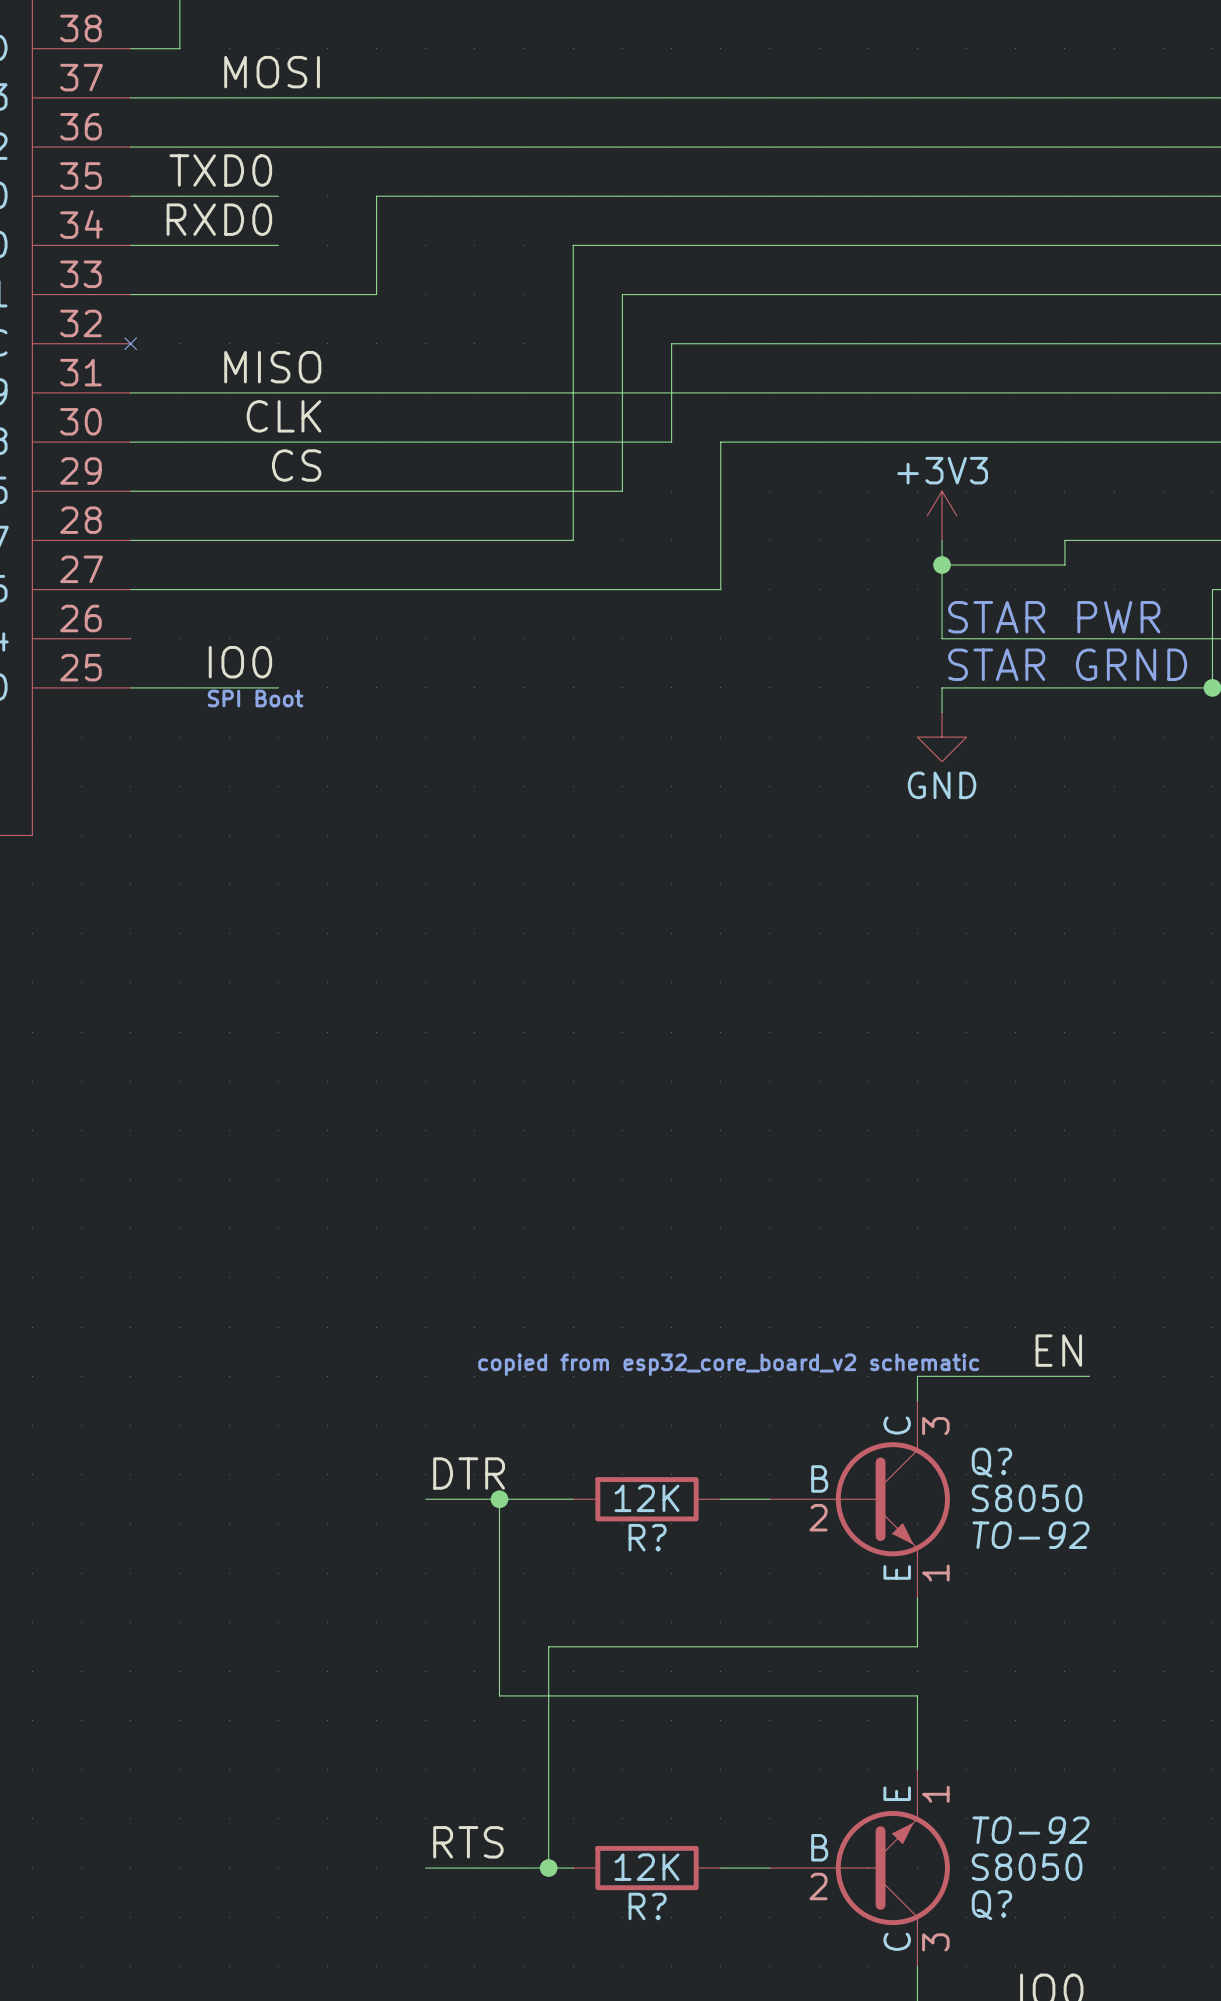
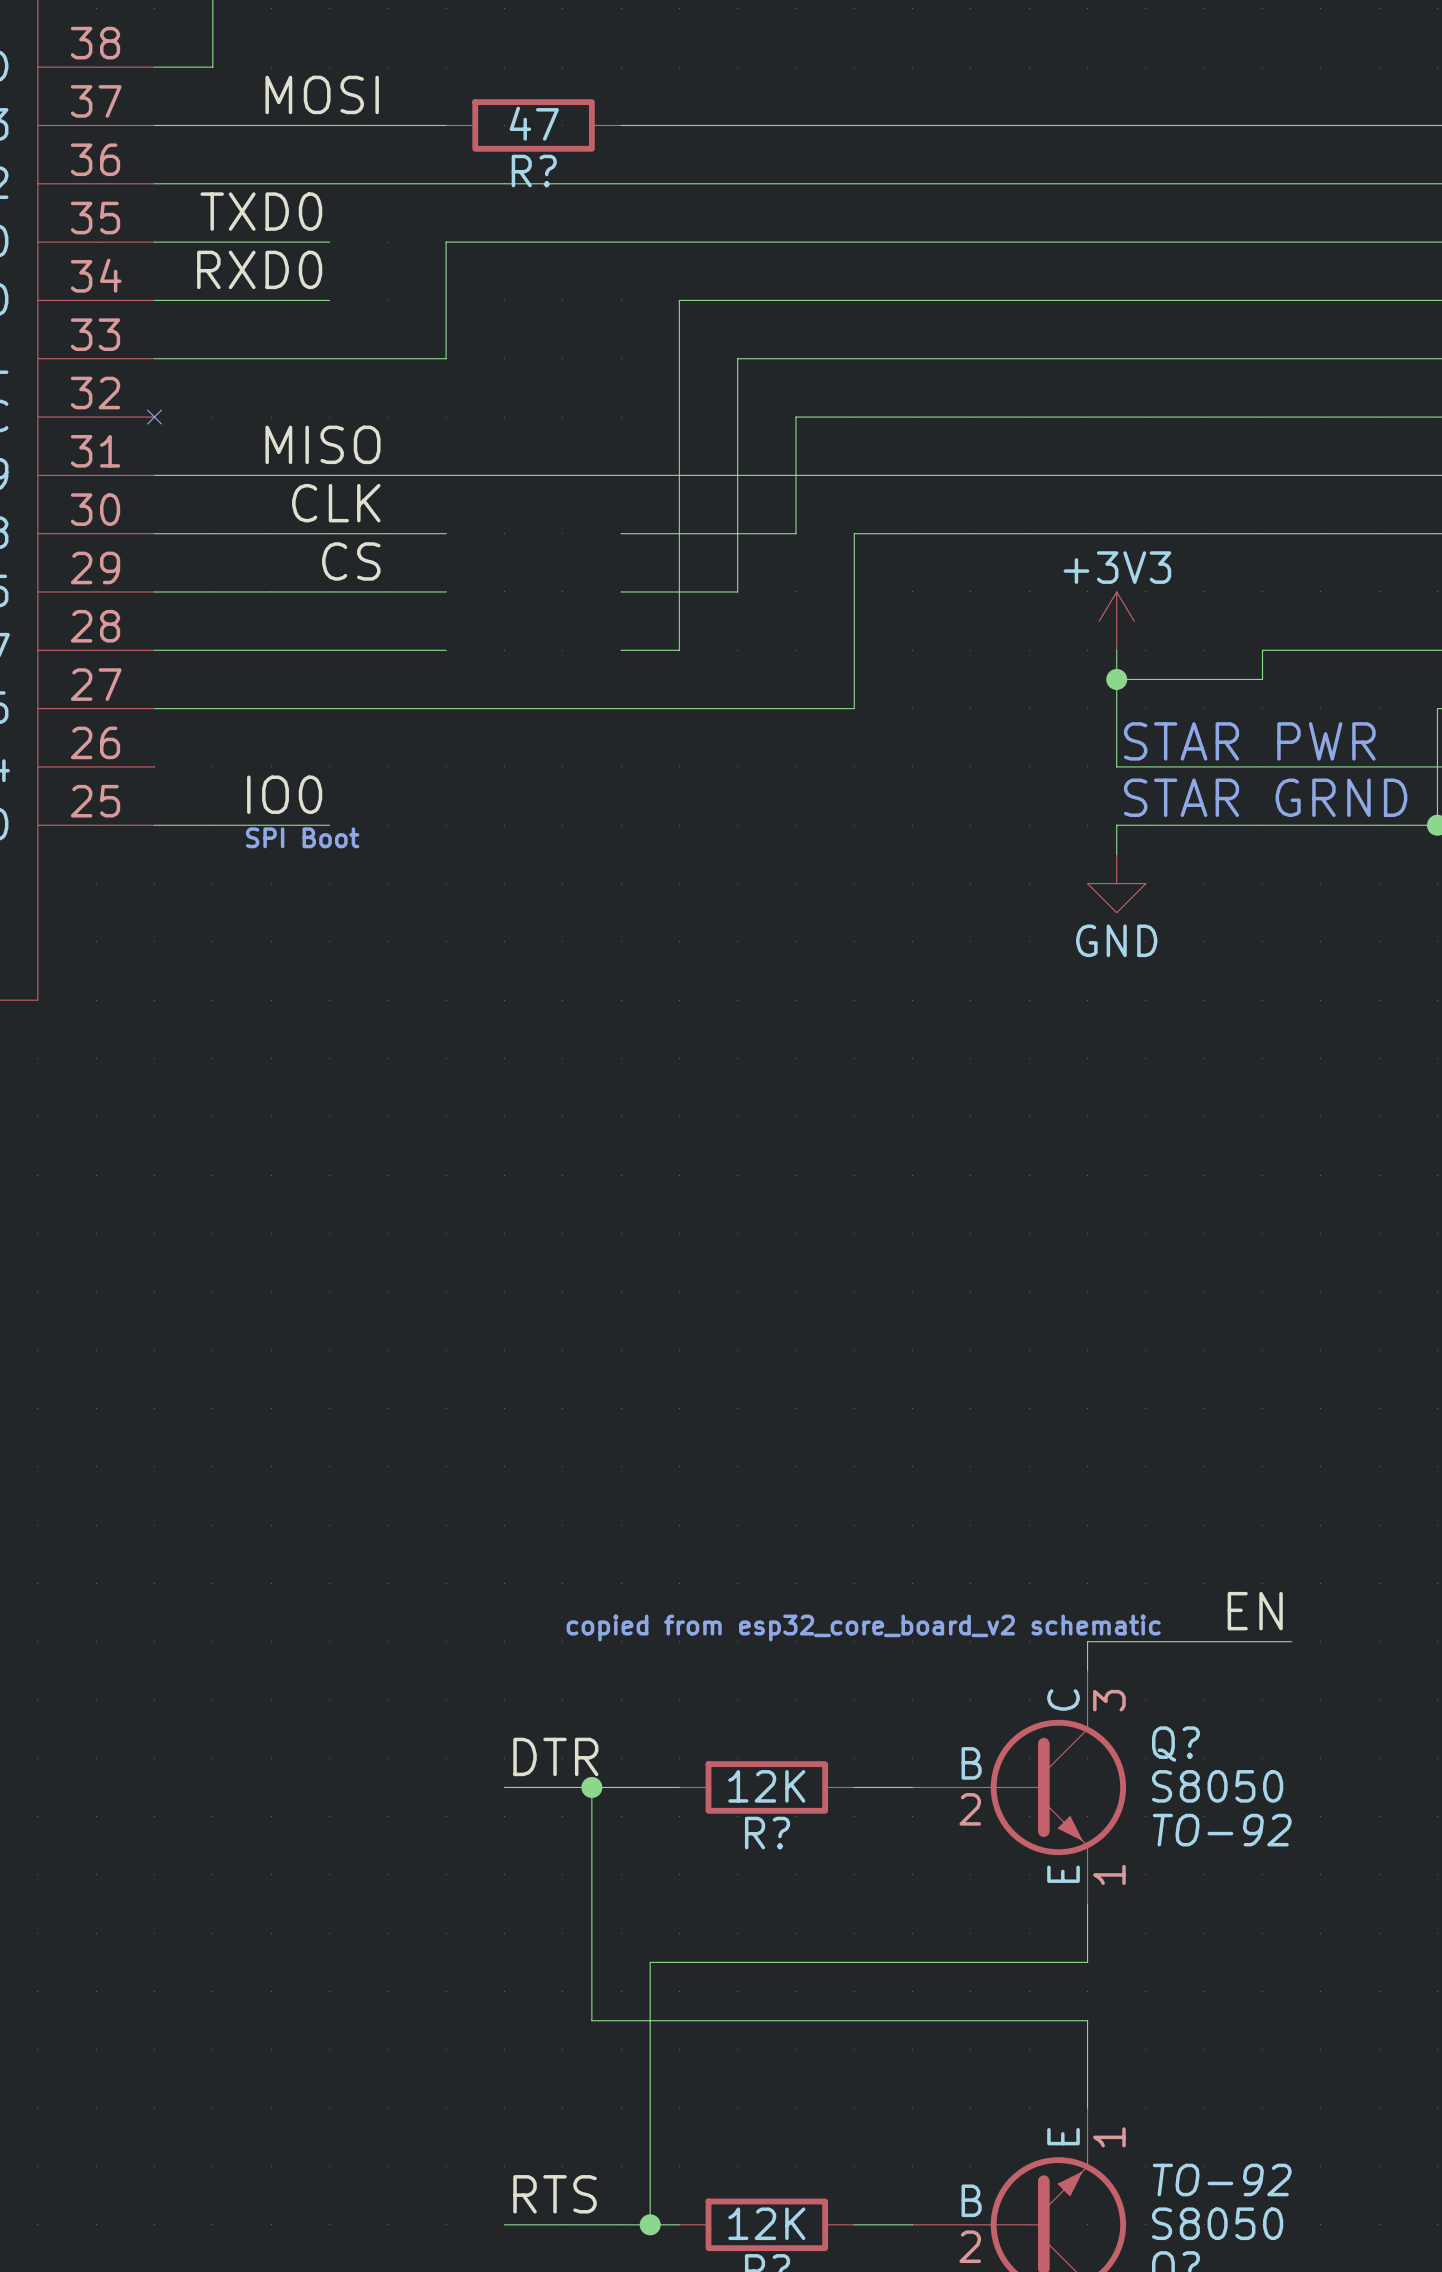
wire: (376, 97) (524, 97) -> none
R?: none -> 47 (533, 125)
wire: (376, 442) (524, 442) -> none
wire: (376, 491) (524, 491) -> none
wire: (376, 540) (524, 540) -> none

